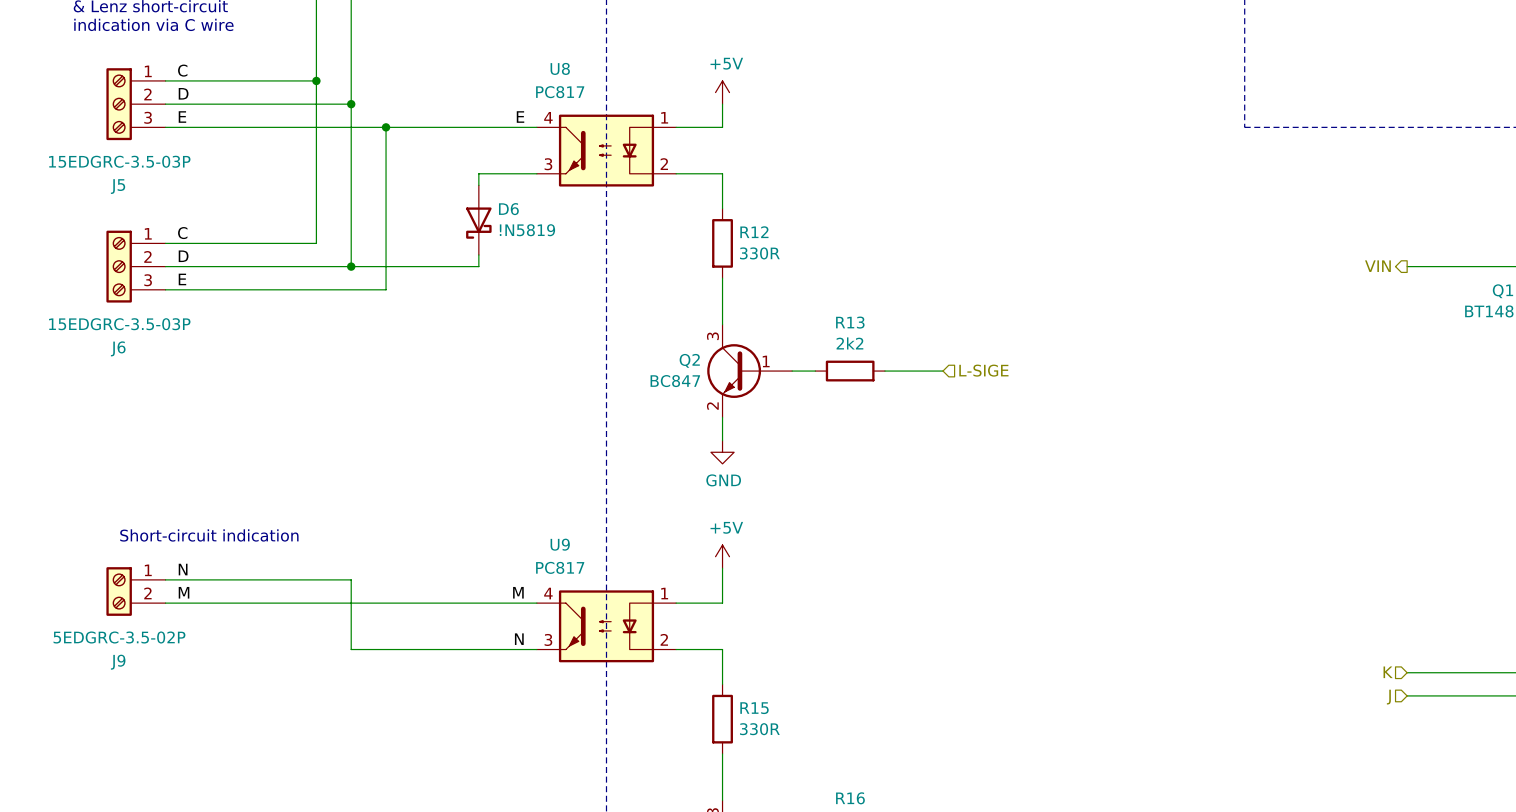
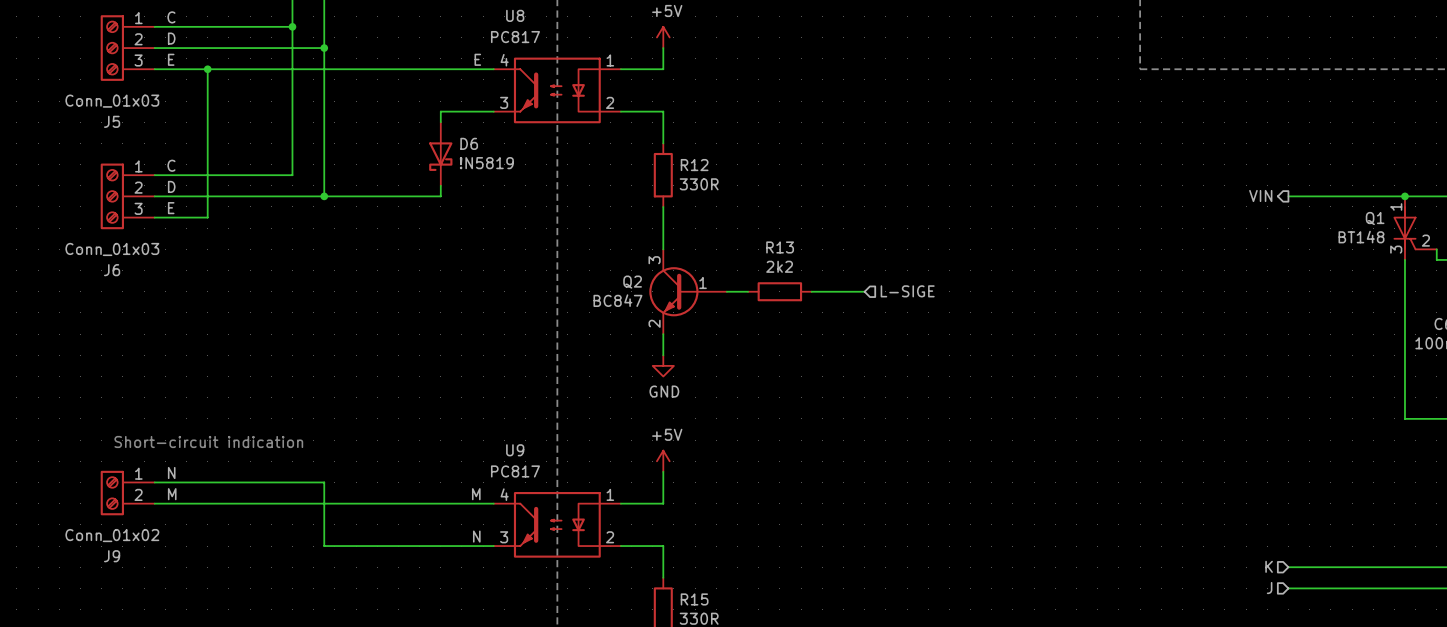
junction: none -> (207, 69)
wire: (386, 127) (386, 289) (223, 289) -> (207, 69) (207, 217)
junction: (386, 127) -> none
J5 value: 15EDGRC-3.5-03P (119, 161) -> Conn_01x03 (112, 101)
J6 value: 15EDGRC-3.5-03P (119, 324) -> Conn_01x03 (112, 249)
J9 value: 5EDGRC-3.5-02P (119, 637) -> Conn_01x02 (112, 535)

